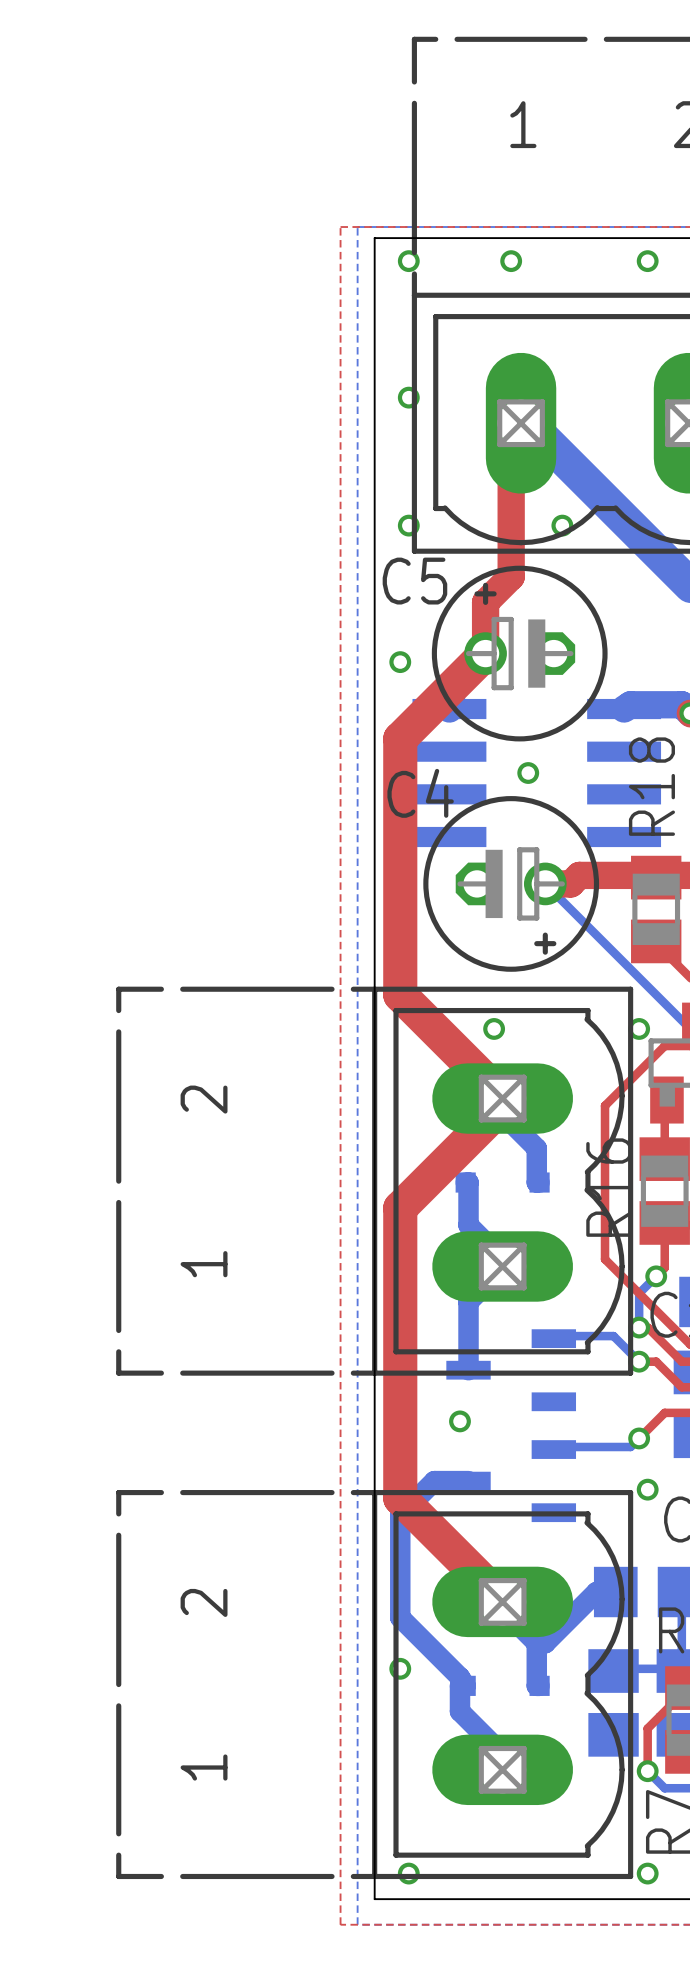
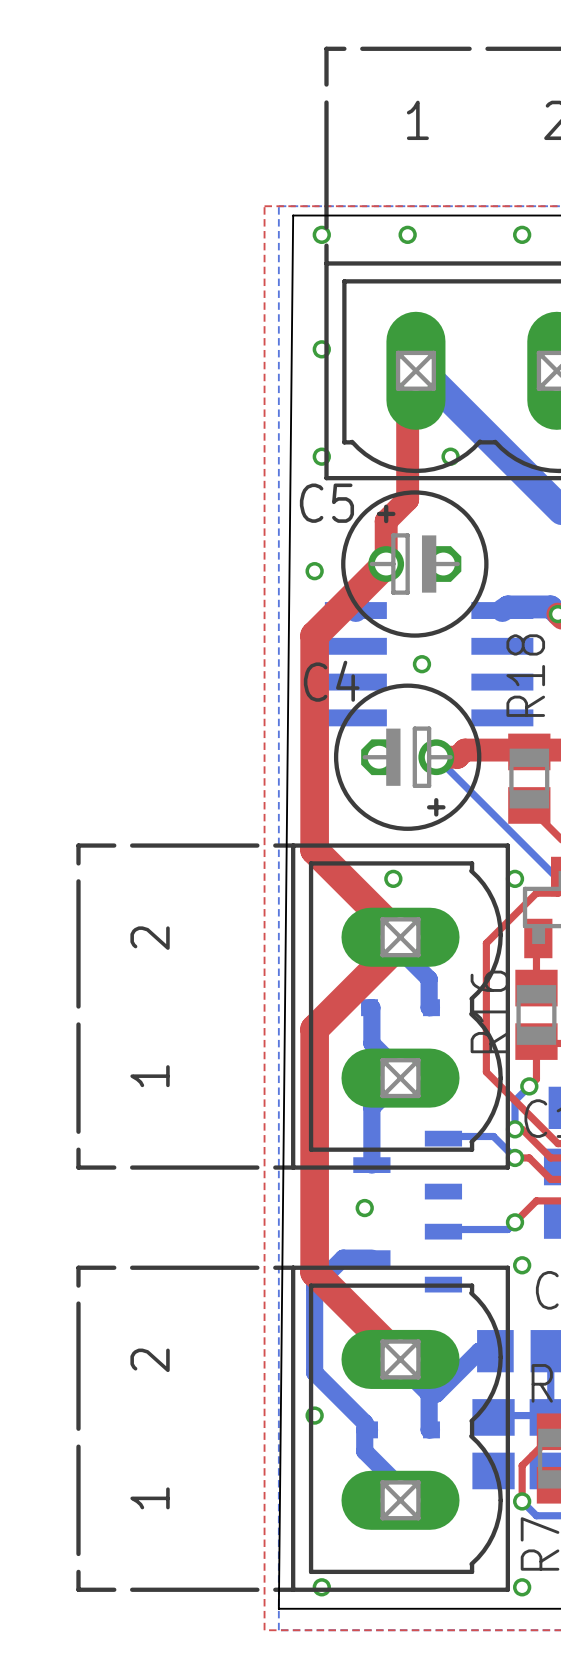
board edge: (374, 238) (374, 1899) -> (293, 215) (278, 1608) (293, 1608)

